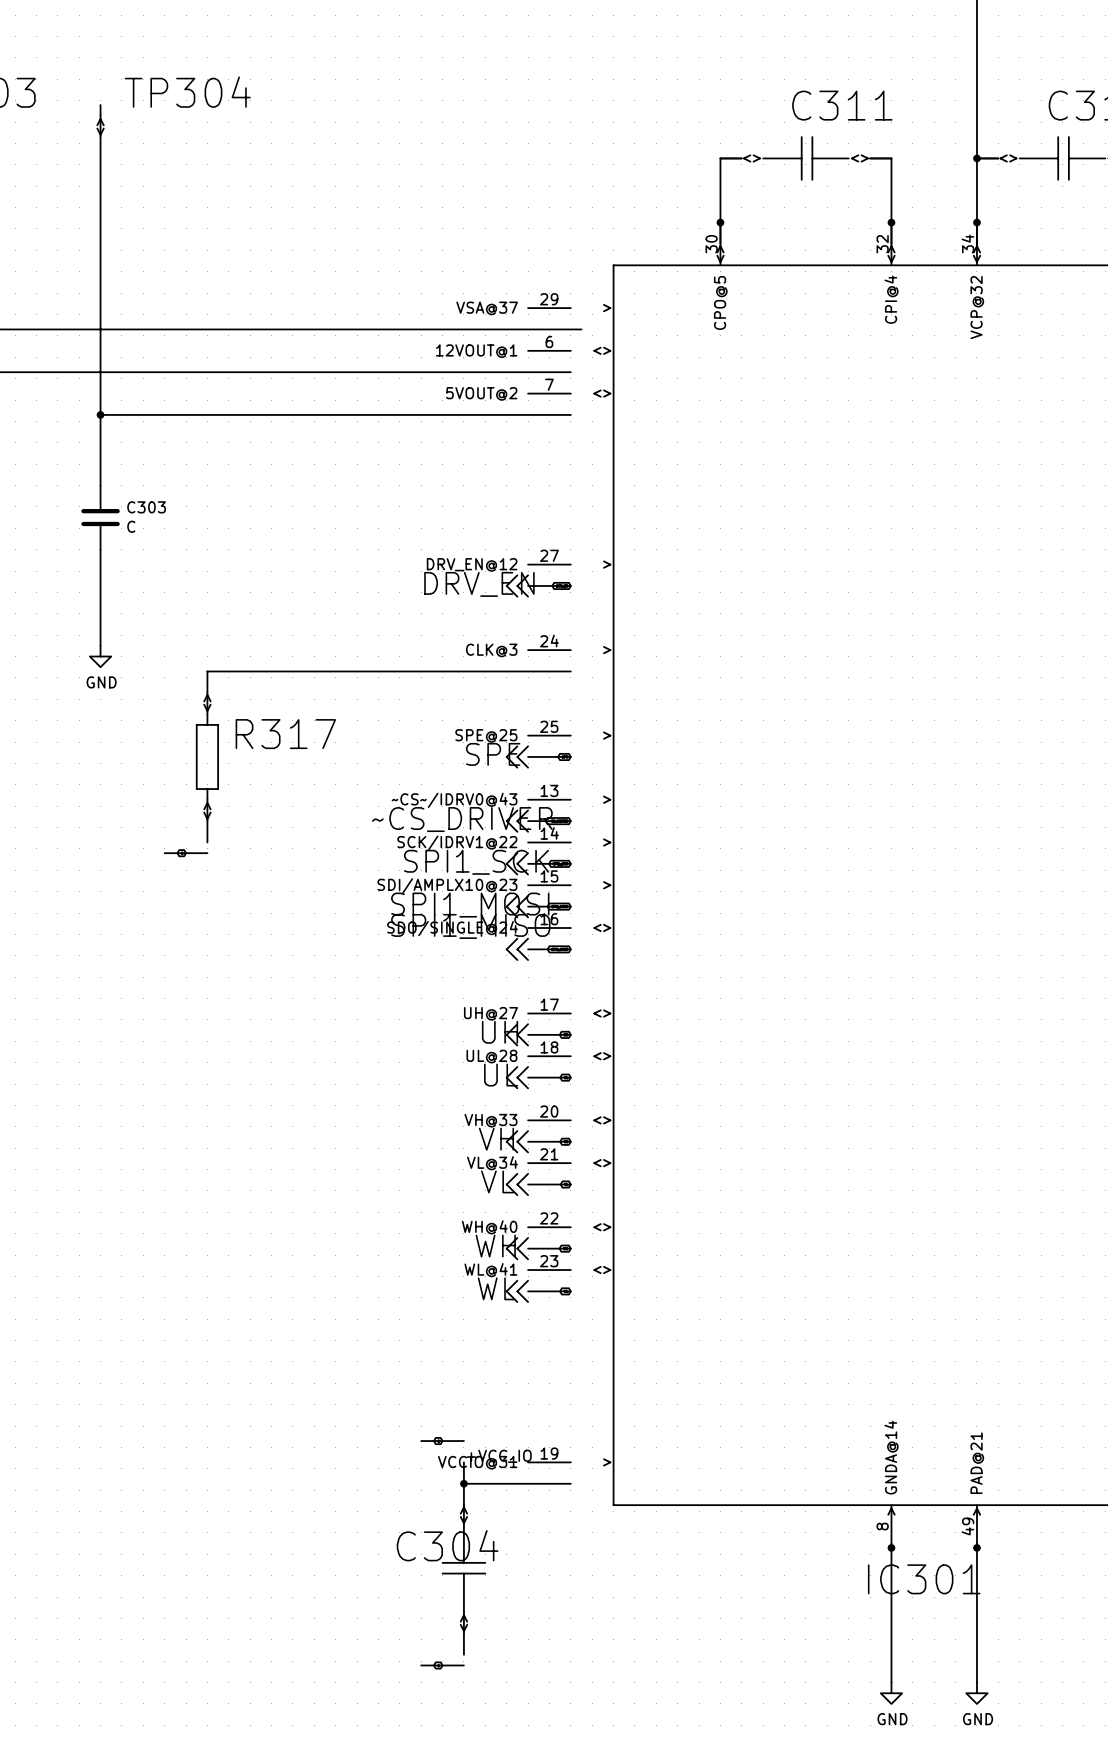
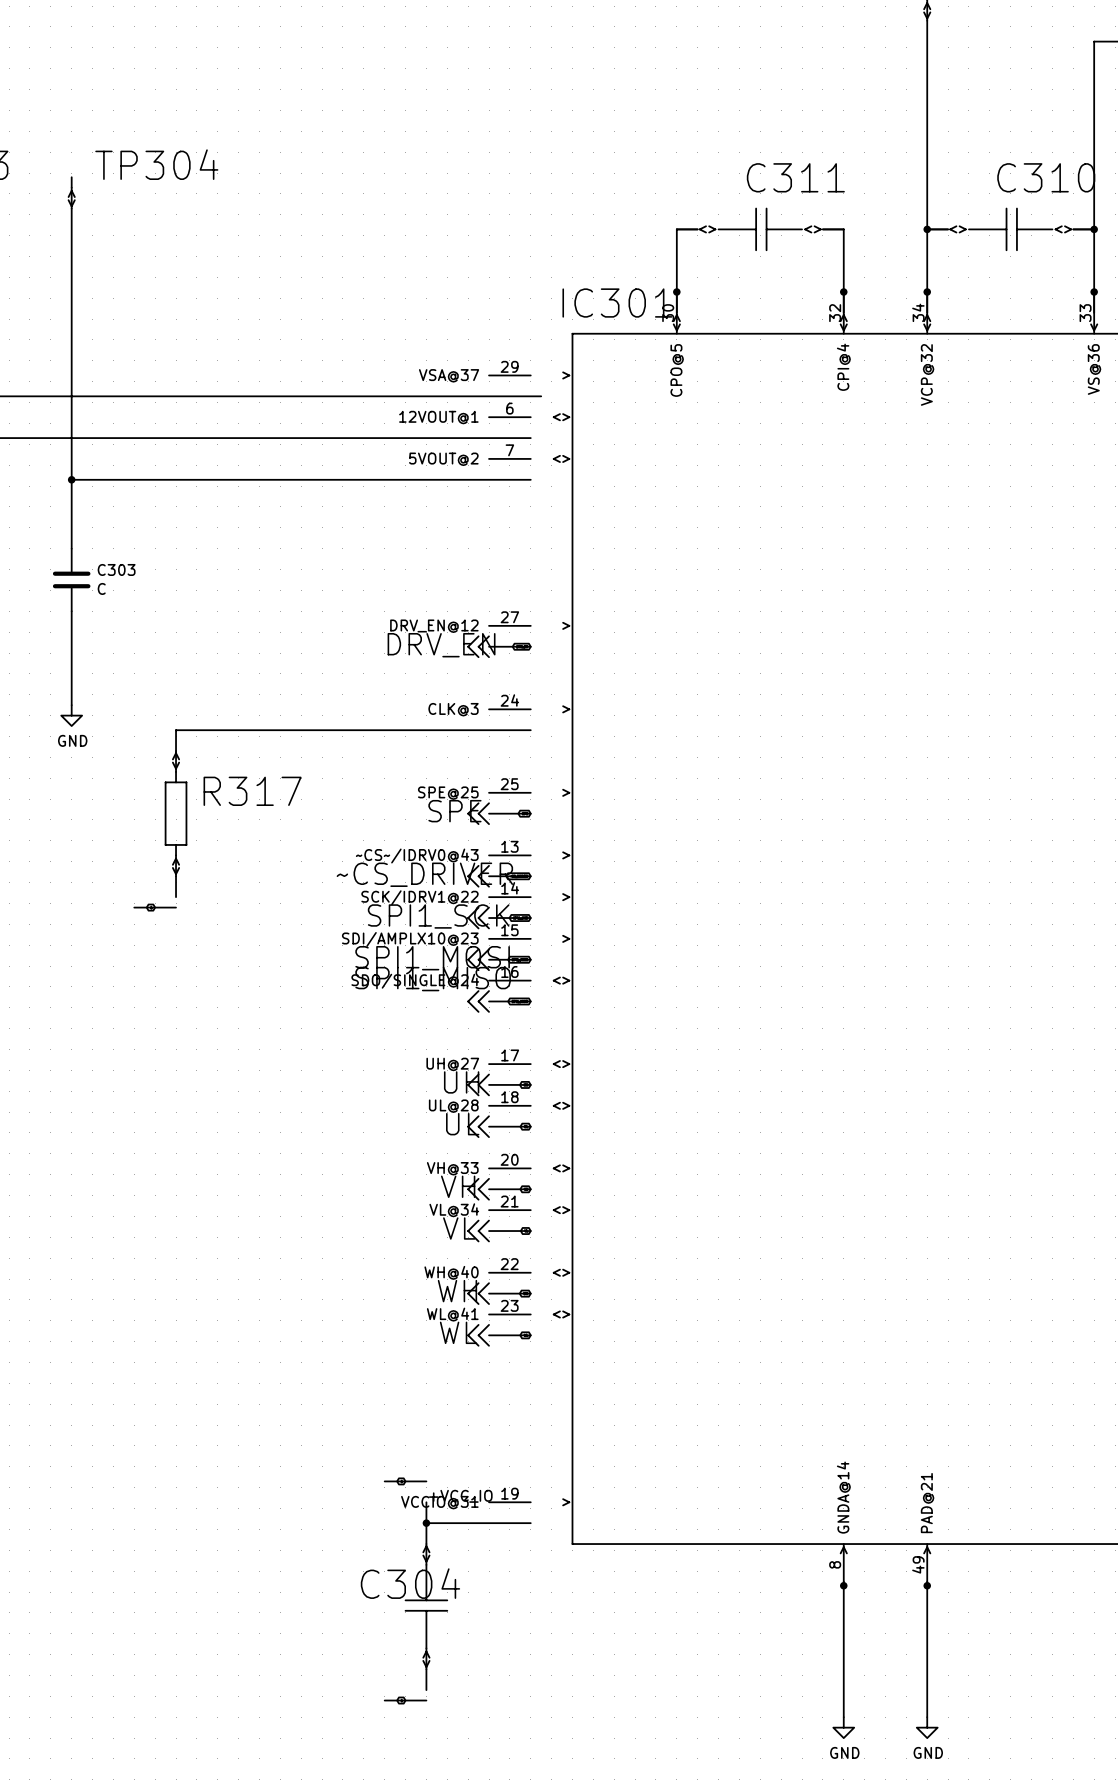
IC301 name position: IC301 (924, 1579) -> IC301 (617, 303)

